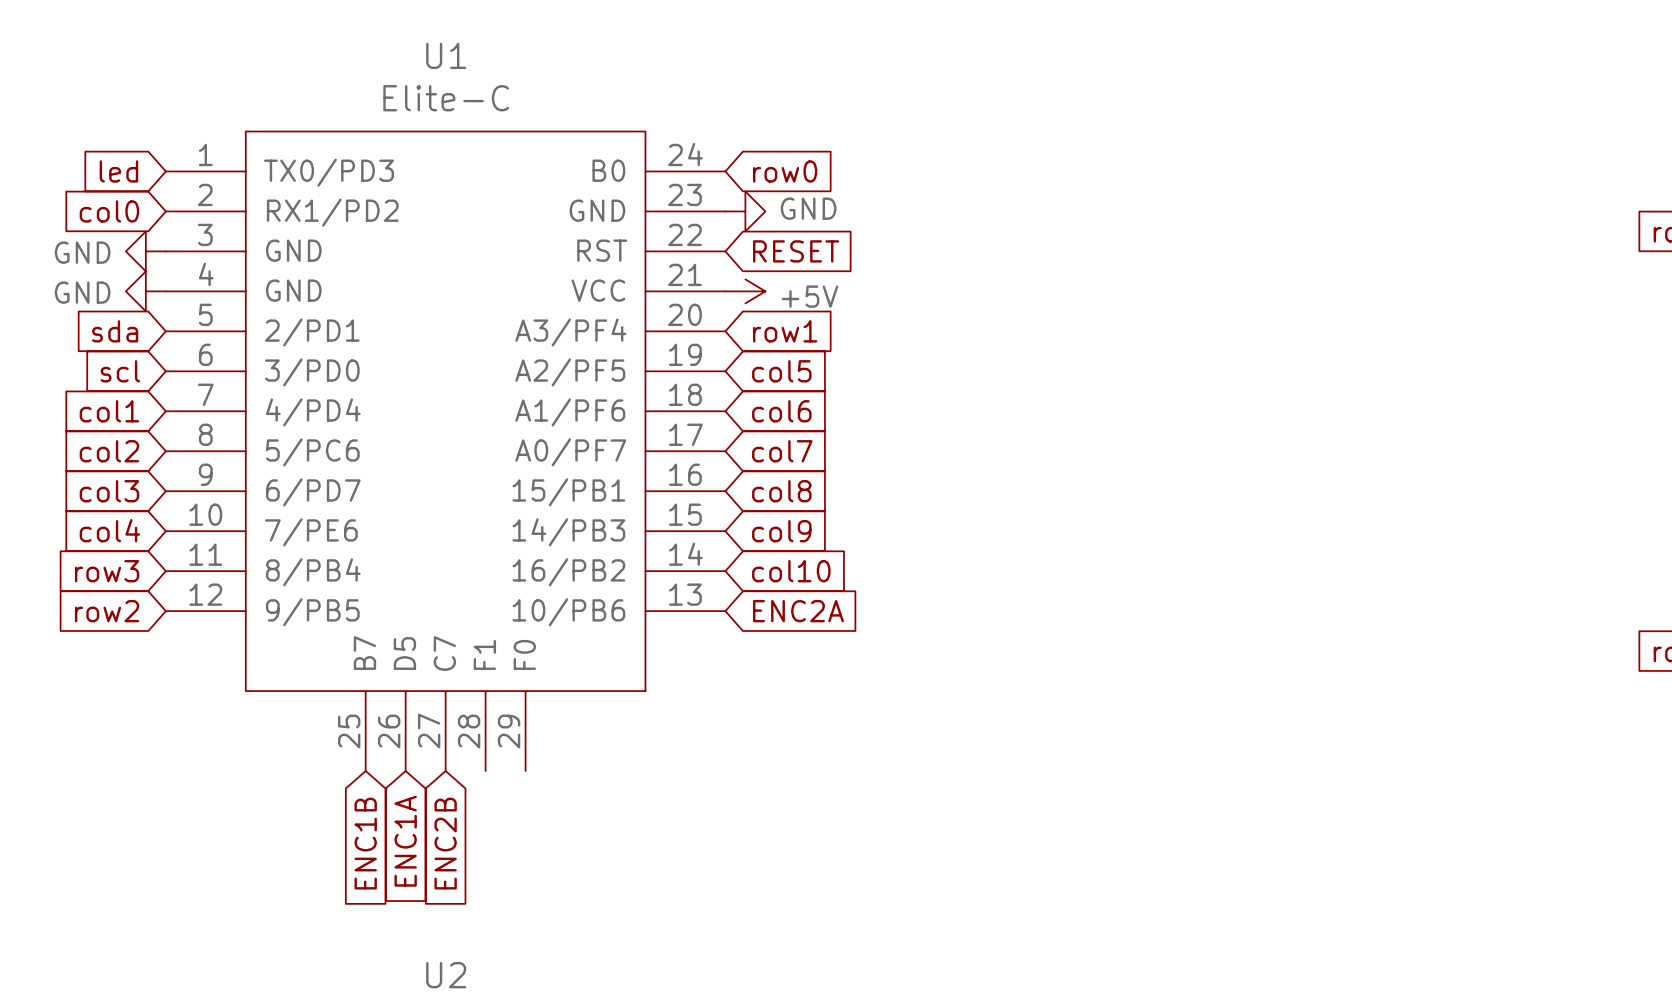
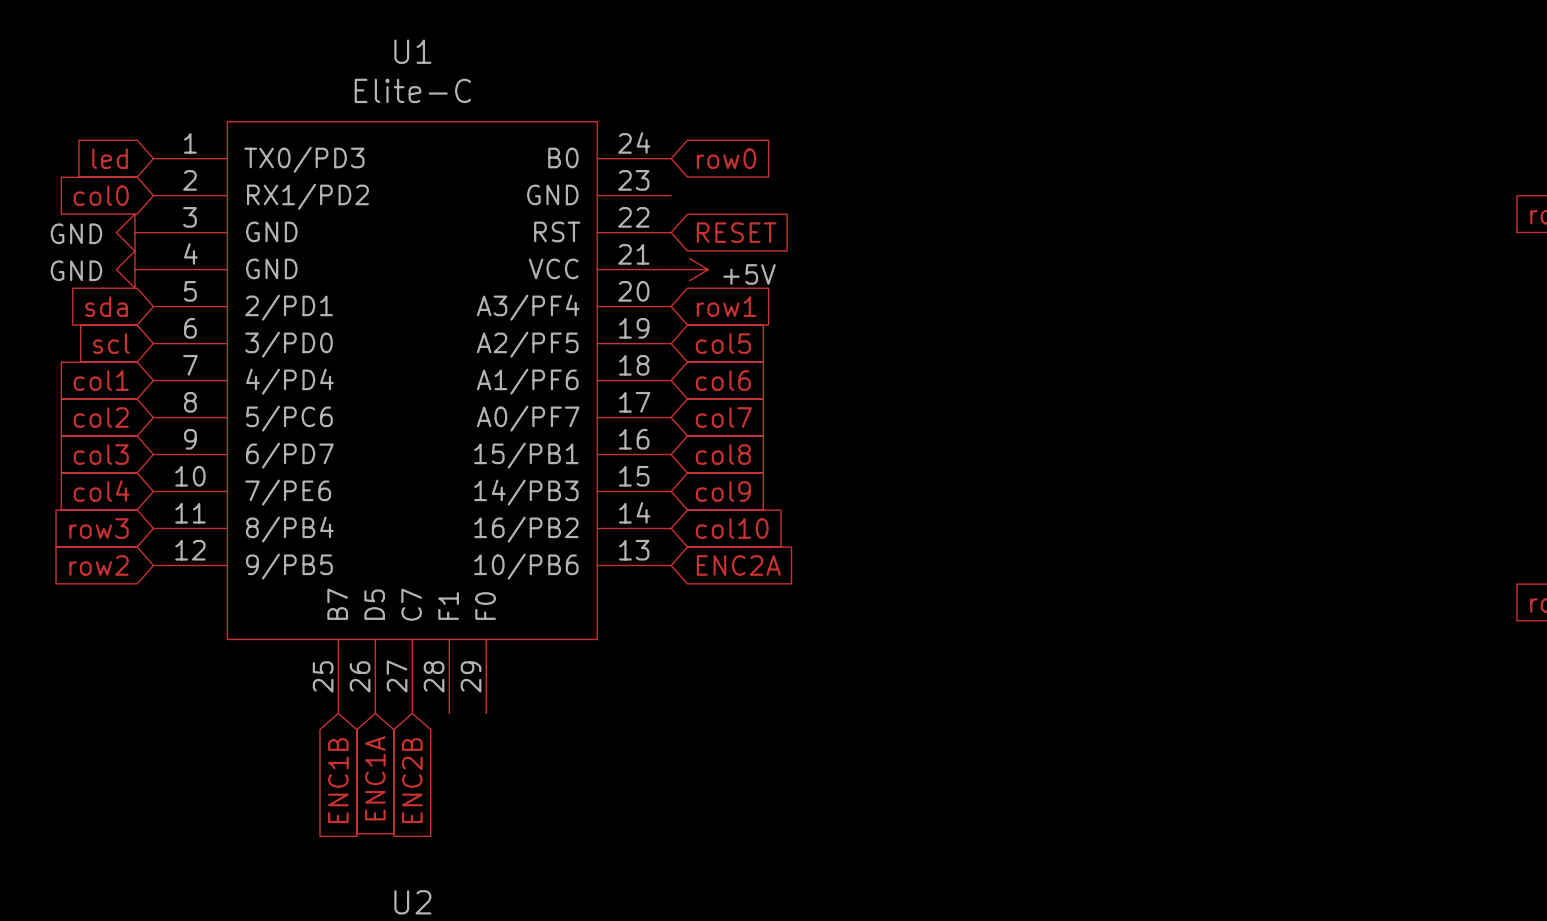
power symbol: GND (745, 211) -> none

